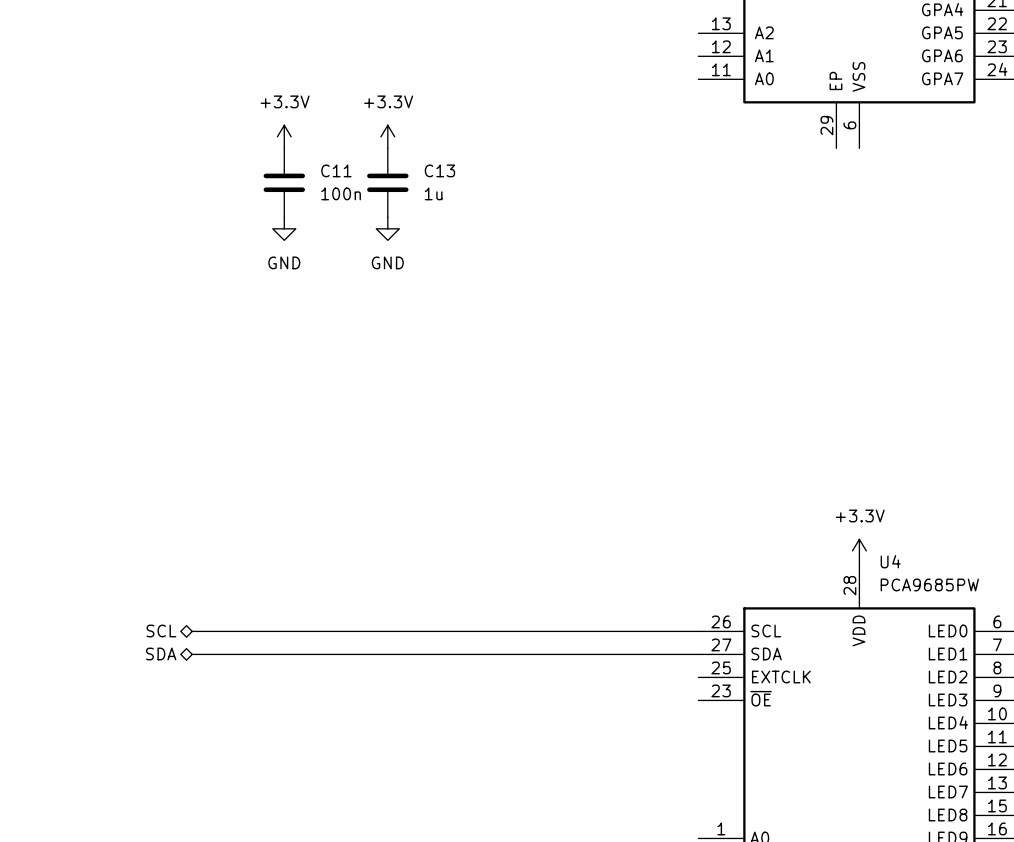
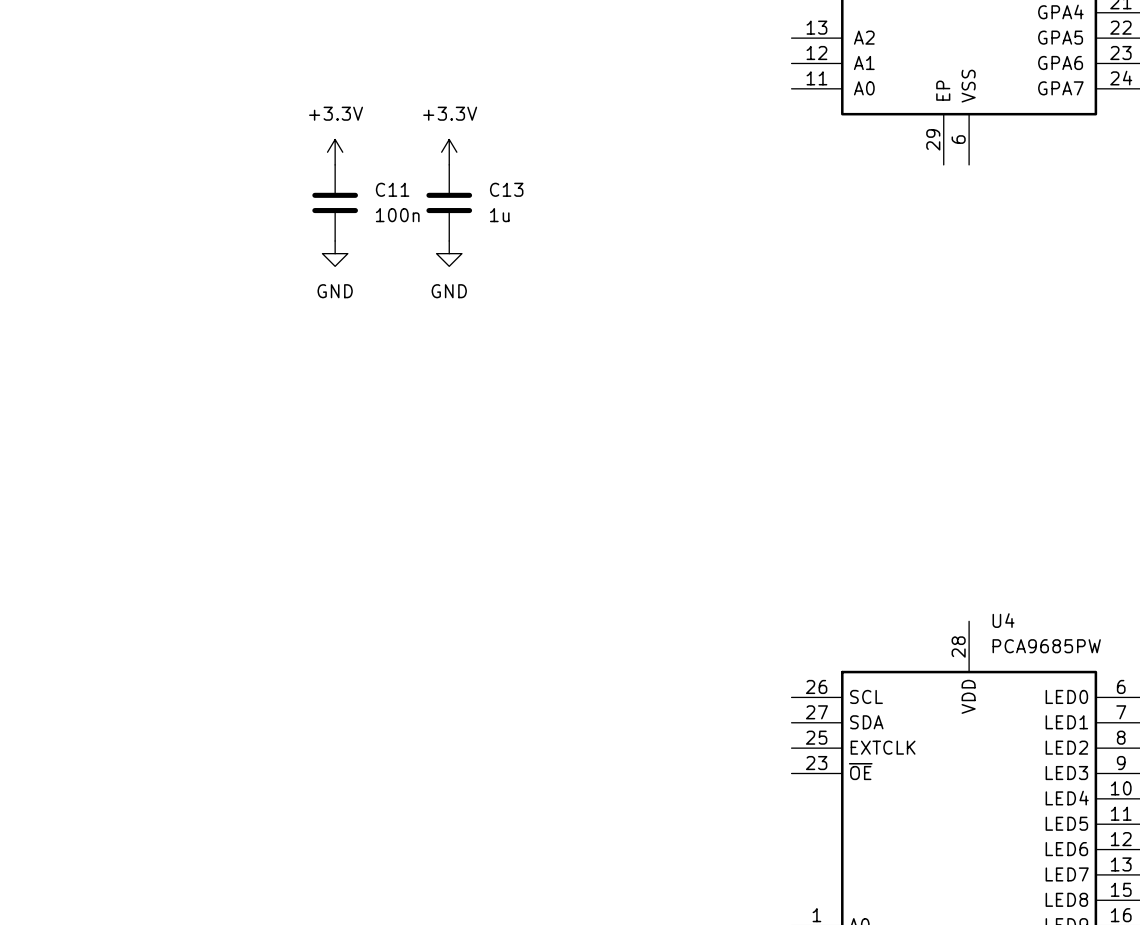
power symbol: +3.3V (859, 550) -> none
hierarchical label: SCL (161, 630) -> none
wire: (192, 631) (698, 631) -> none
hierarchical label: SDA (161, 653) -> none
wire: (192, 654) (698, 654) -> none

